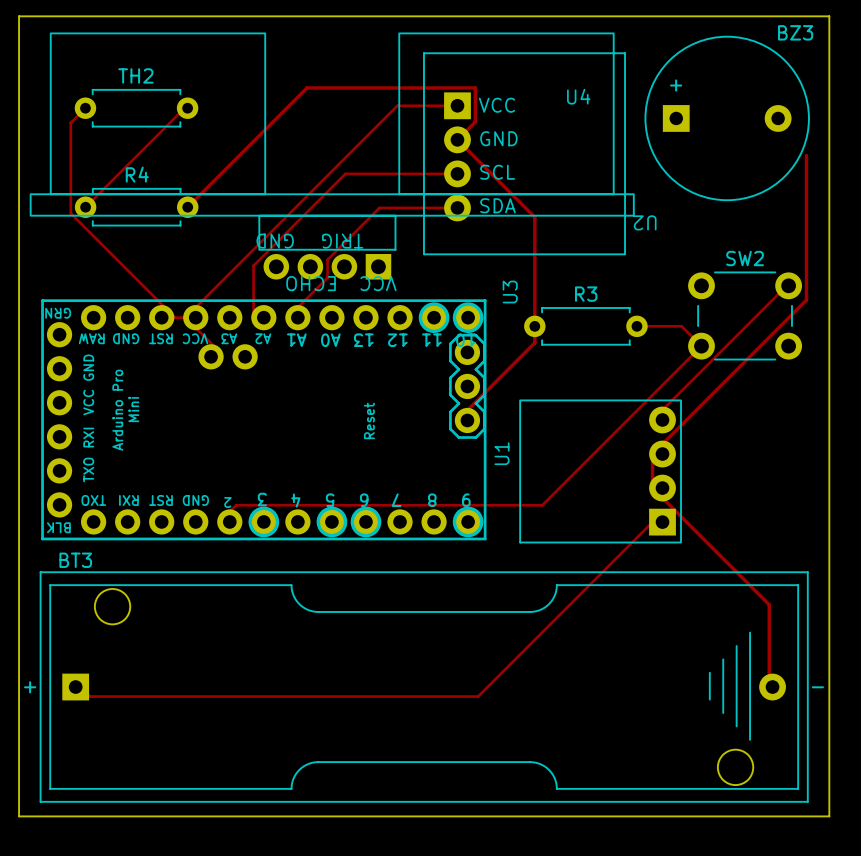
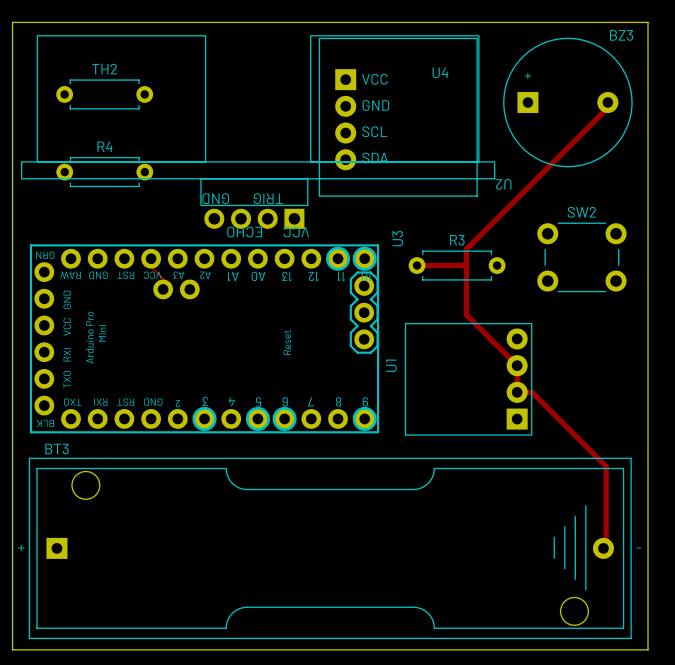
track: (457, 105) (397, 105) (185, 317) (175, 317) (70, 213) (70, 122) (85, 108) -> none
track: (187, 108) (184, 108) (85, 207) -> none
track: none -> (613, 102) (466, 249) (466, 314) (517, 365) (517, 392) (532, 392) (606, 466) (606, 544)
U4 position: (524, 153) -> (398, 117)
track: (806, 155) (806, 300) (652, 454) (652, 488) (769, 604) (769, 679) -> none
track: (457, 173) (345, 173) (253, 265) (253, 317) -> none
track: (187, 207) (306, 87) (475, 87) (475, 122) (457, 139) (534, 217) (534, 342) (457, 420) -> none
track: (457, 207) (379, 207) (327, 259) (327, 277) (287, 317) -> none
track: (788, 285) (652, 419) -> none
track: none -> (466, 262) (463, 265) (417, 265)
track: (636, 326) (681, 326) (701, 346) (542, 505) (236, 505) (219, 521) -> none
track: (652, 522) (478, 696) (89, 696) (72, 679) -> none

